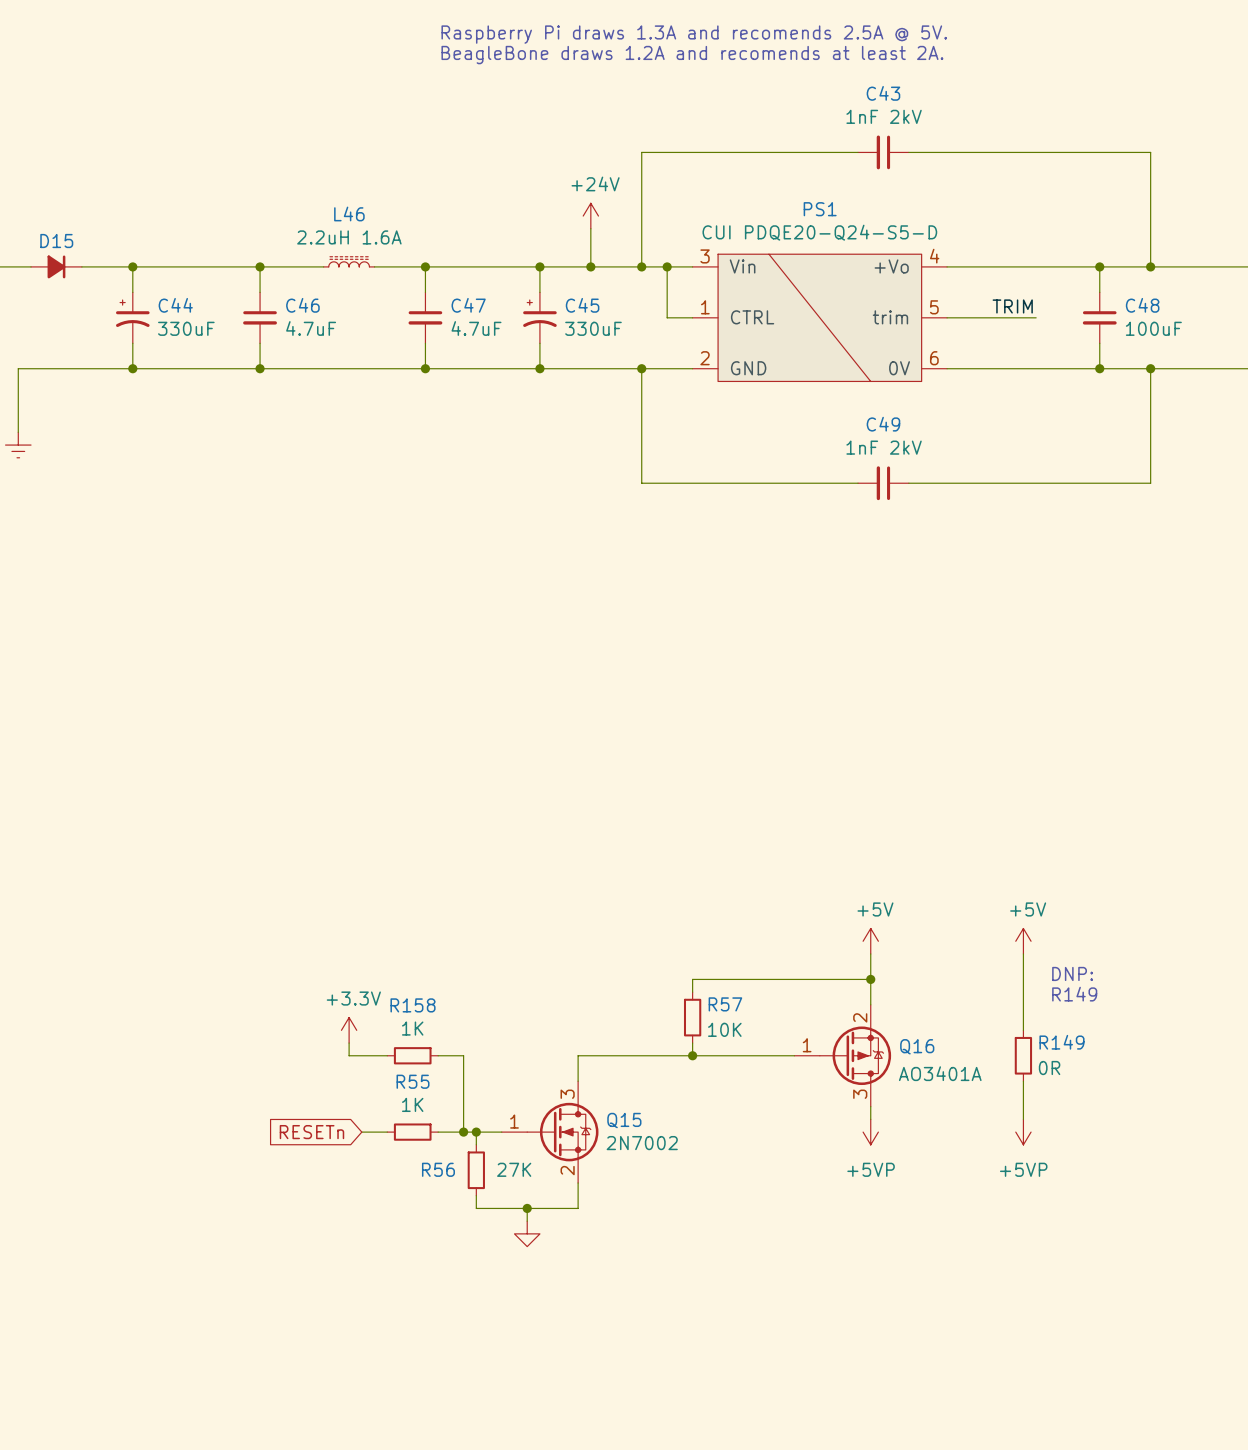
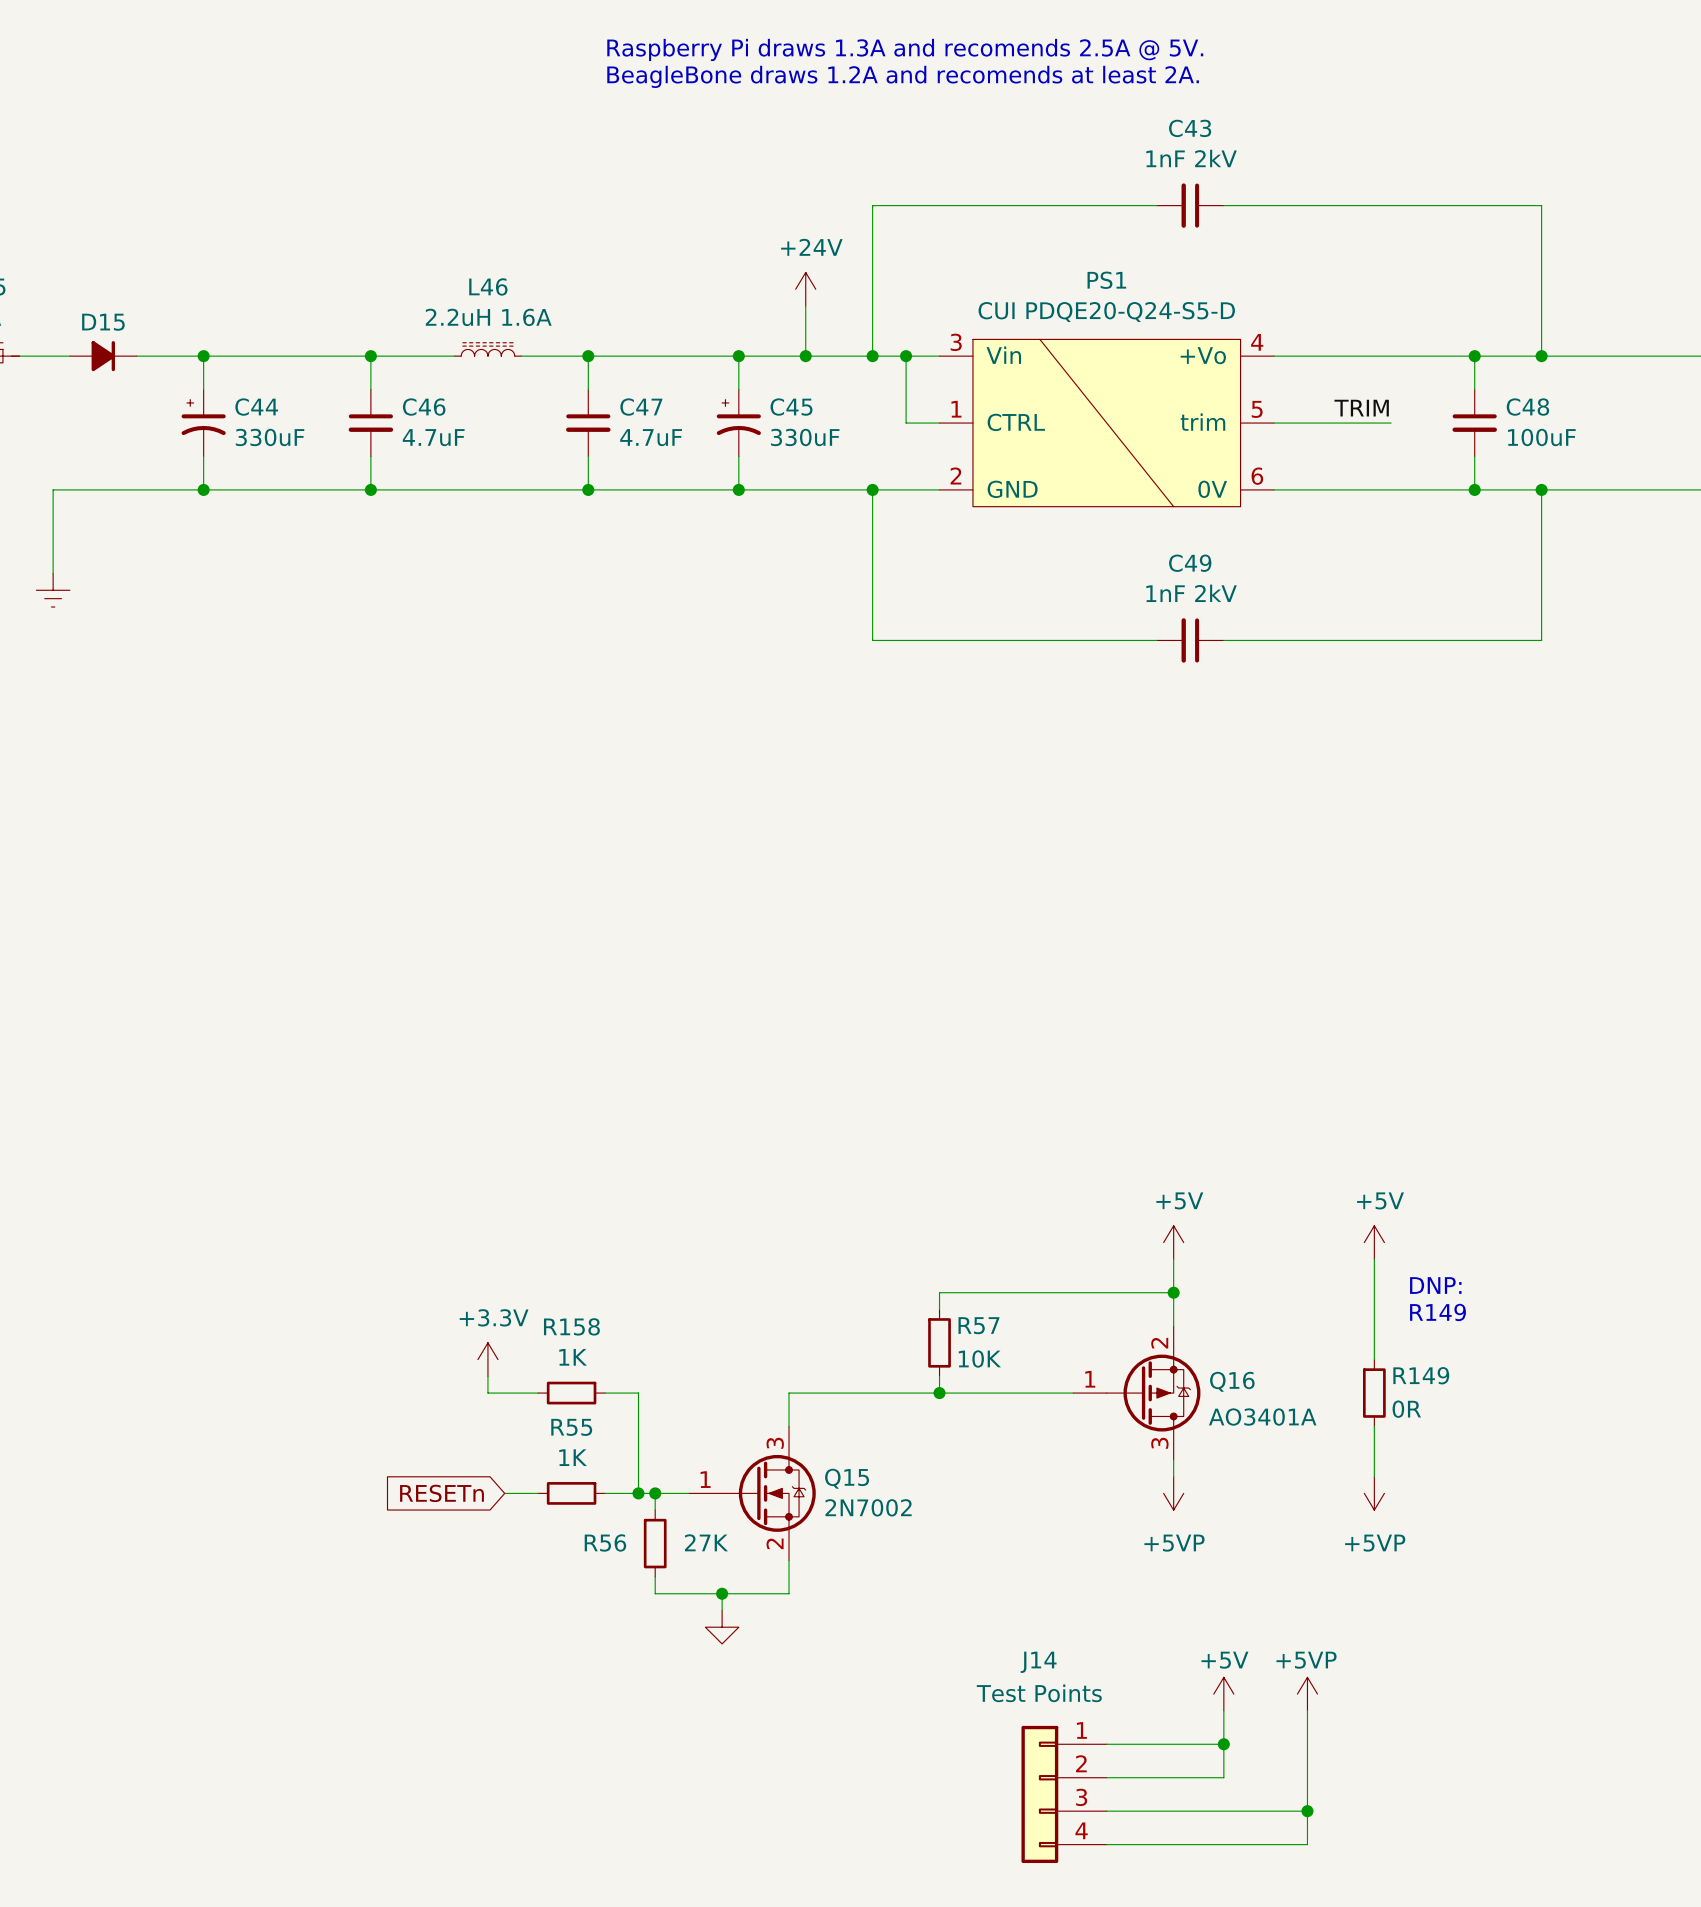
power symbol: none -> +5V (1223, 1694)
power symbol: none -> +5VP (1307, 1694)
wire: none -> (1223, 1710) (1223, 1777) (1106, 1777)
wire: none -> (1307, 1710) (1307, 1844) (1106, 1844)
wire: none -> (1106, 1744) (1223, 1744)
junction: none -> (1223, 1744)
J14: none -> Test Points (1064, 1794)
wire: none -> (1106, 1811) (1307, 1811)
junction: none -> (1307, 1811)

